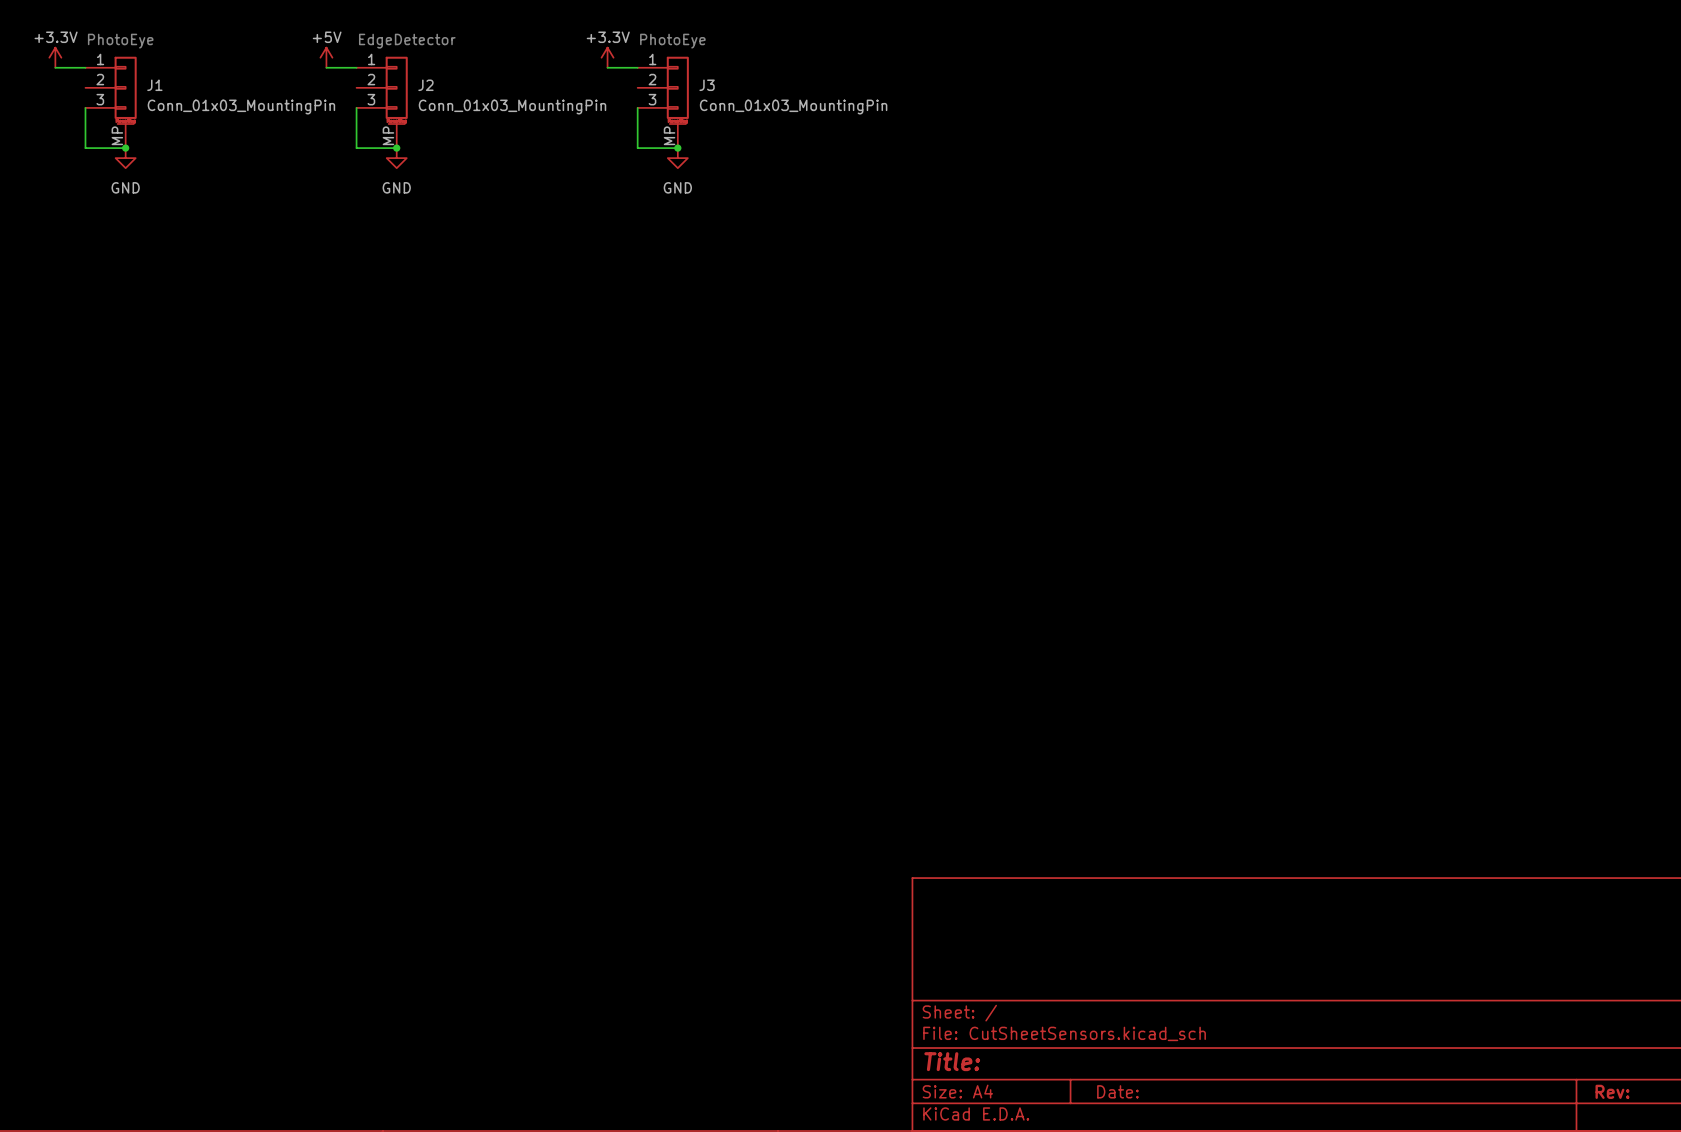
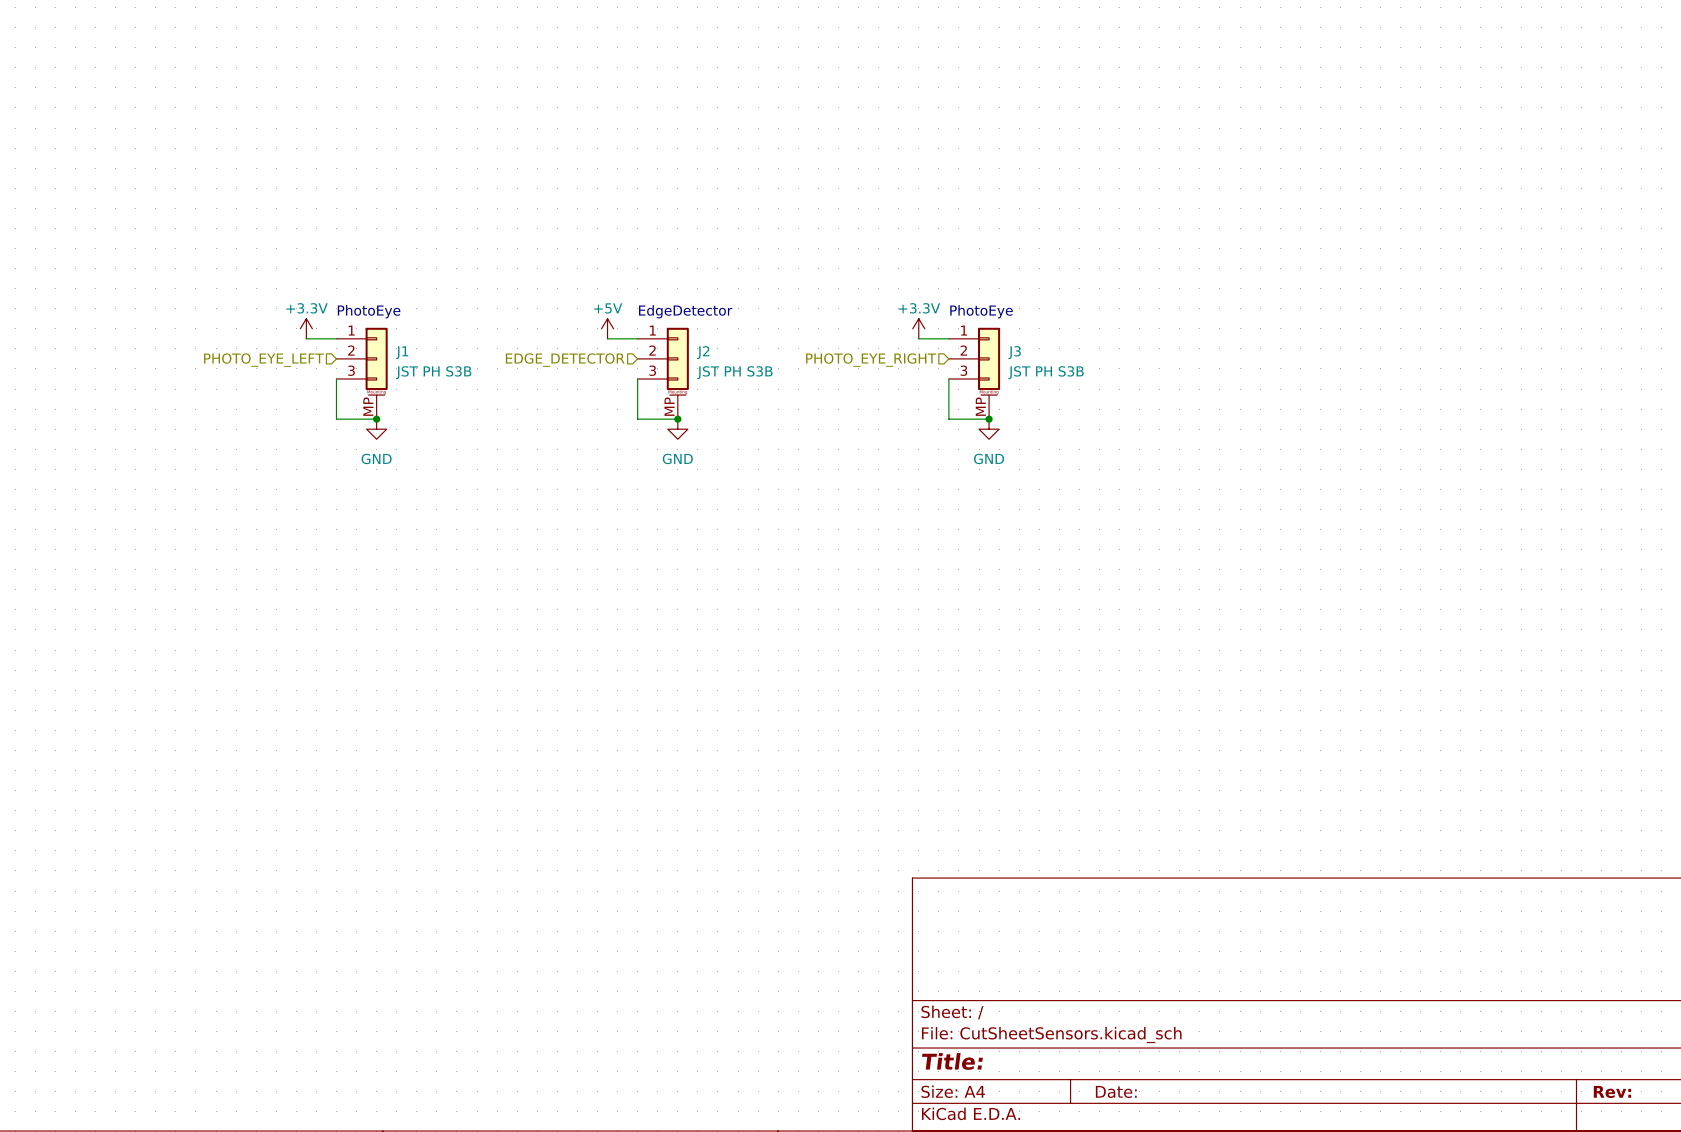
text: PhotoEye (120, 41) -> none
text: EdgeDetector (407, 41) -> none
text: PhotoEye (672, 41) -> none
power symbol: +3.3V (55, 57) -> none
power symbol: +5V (326, 57) -> none
power symbol: +3.3V (607, 57) -> none
wire: (55, 67) (85, 67) -> none
wire: (326, 67) (356, 67) -> none
wire: (607, 67) (637, 67) -> none
J1 name position: J1 (154, 85) -> J1 (402, 352)
J2 name position: J2 (425, 85) -> J2 (703, 352)
J3 name position: J3 (707, 85) -> J3 (1014, 352)
J1 position: (111, 102) -> (362, 373)
J2 position: (382, 102) -> (663, 373)
J3 position: (663, 102) -> (974, 373)
wire: (85, 107) (85, 148) (125, 148) -> none
J1 value: Conn_01x03_MountingPin (241, 107) -> JST PH S3B (433, 372)
wire: (356, 107) (356, 148) (396, 148) -> none
J2 value: Conn_01x03_MountingPin (512, 107) -> JST PH S3B (734, 372)
wire: (637, 107) (637, 148) (677, 148) -> none
J3 value: Conn_01x03_MountingPin (793, 107) -> JST PH S3B (1046, 372)
junction: (125, 148) -> none
junction: (396, 148) -> none
junction: (677, 148) -> none
power symbol: GND (125, 158) -> none
power symbol: GND (396, 158) -> none
power symbol: GND (677, 158) -> none
text: none -> PhotoEye (369, 311)
text: none -> EdgeDetector (685, 311)
text: none -> PhotoEye (981, 311)
power symbol: none -> +3.3V (306, 328)
power symbol: none -> +5V (607, 328)
power symbol: none -> +3.3V (918, 328)
wire: none -> (306, 338) (336, 338)
wire: none -> (607, 338) (637, 338)
wire: none -> (918, 338) (948, 338)
hierarchical label: none -> PHOTO_EYE_LEFT (263, 360)
hierarchical label: none -> EDGE_DETECTOR (565, 360)
hierarchical label: none -> PHOTO_EYE_RIGHT (871, 360)
wire: none -> (336, 378) (336, 419) (376, 419)
wire: none -> (637, 378) (637, 419) (677, 419)
wire: none -> (948, 378) (948, 419) (989, 419)
junction: none -> (376, 419)
junction: none -> (677, 419)
junction: none -> (989, 419)
power symbol: none -> GND (376, 429)
power symbol: none -> GND (677, 429)
power symbol: none -> GND (989, 429)

